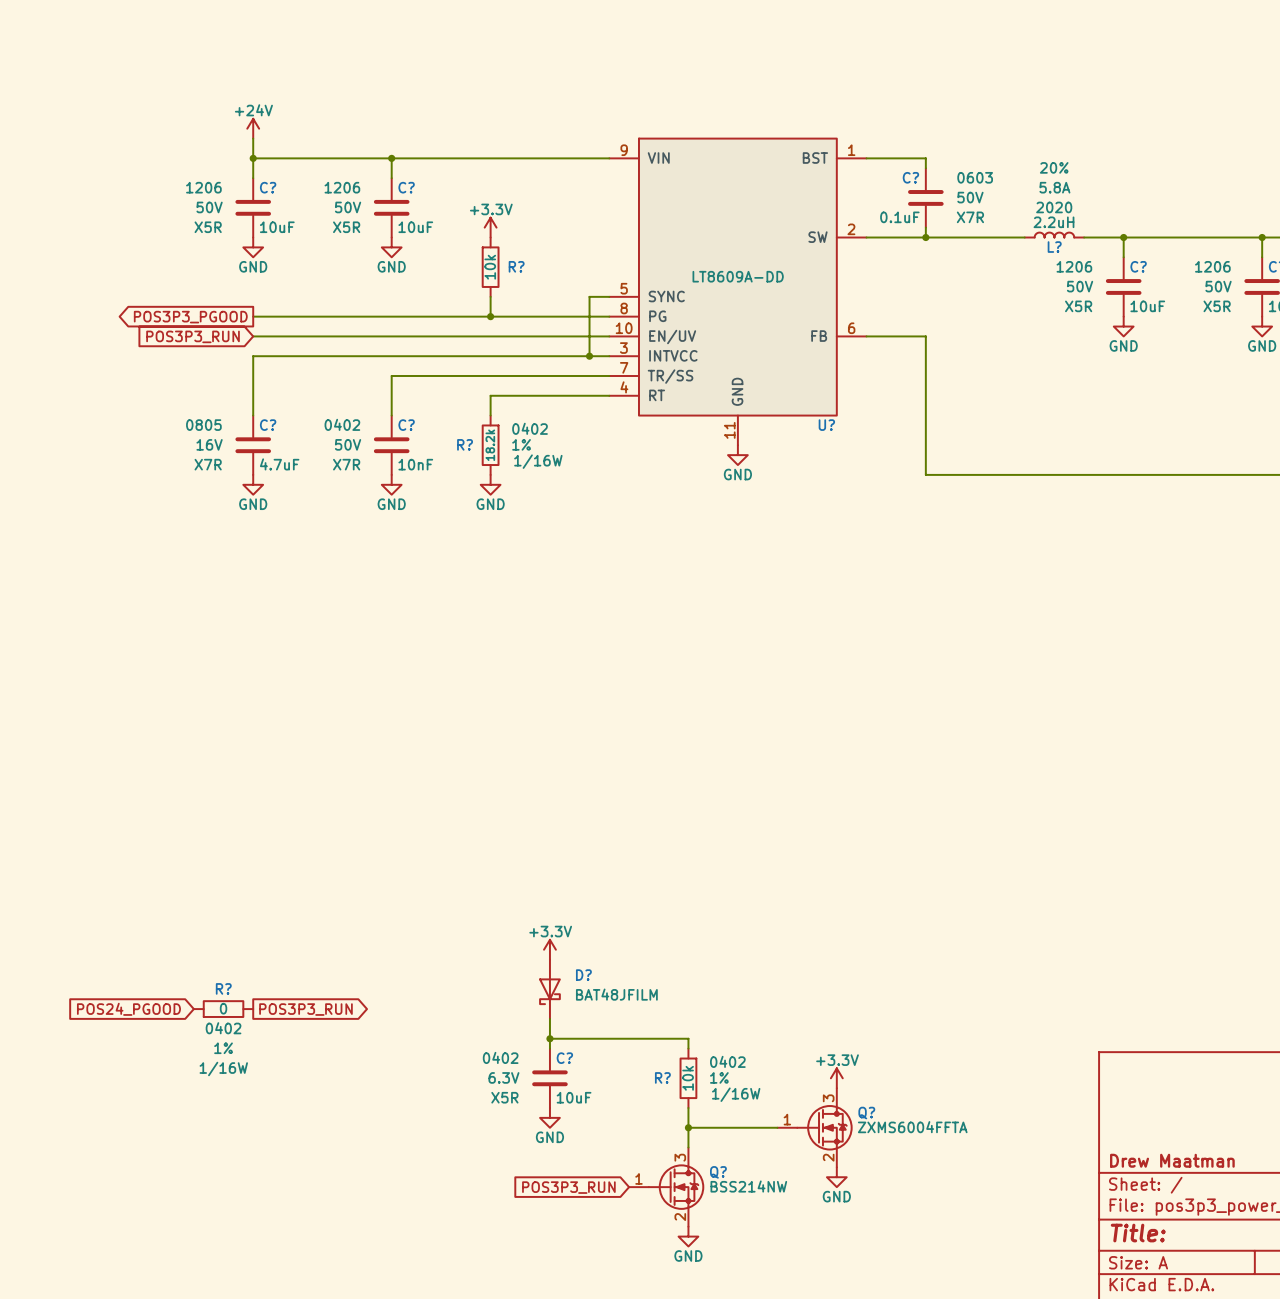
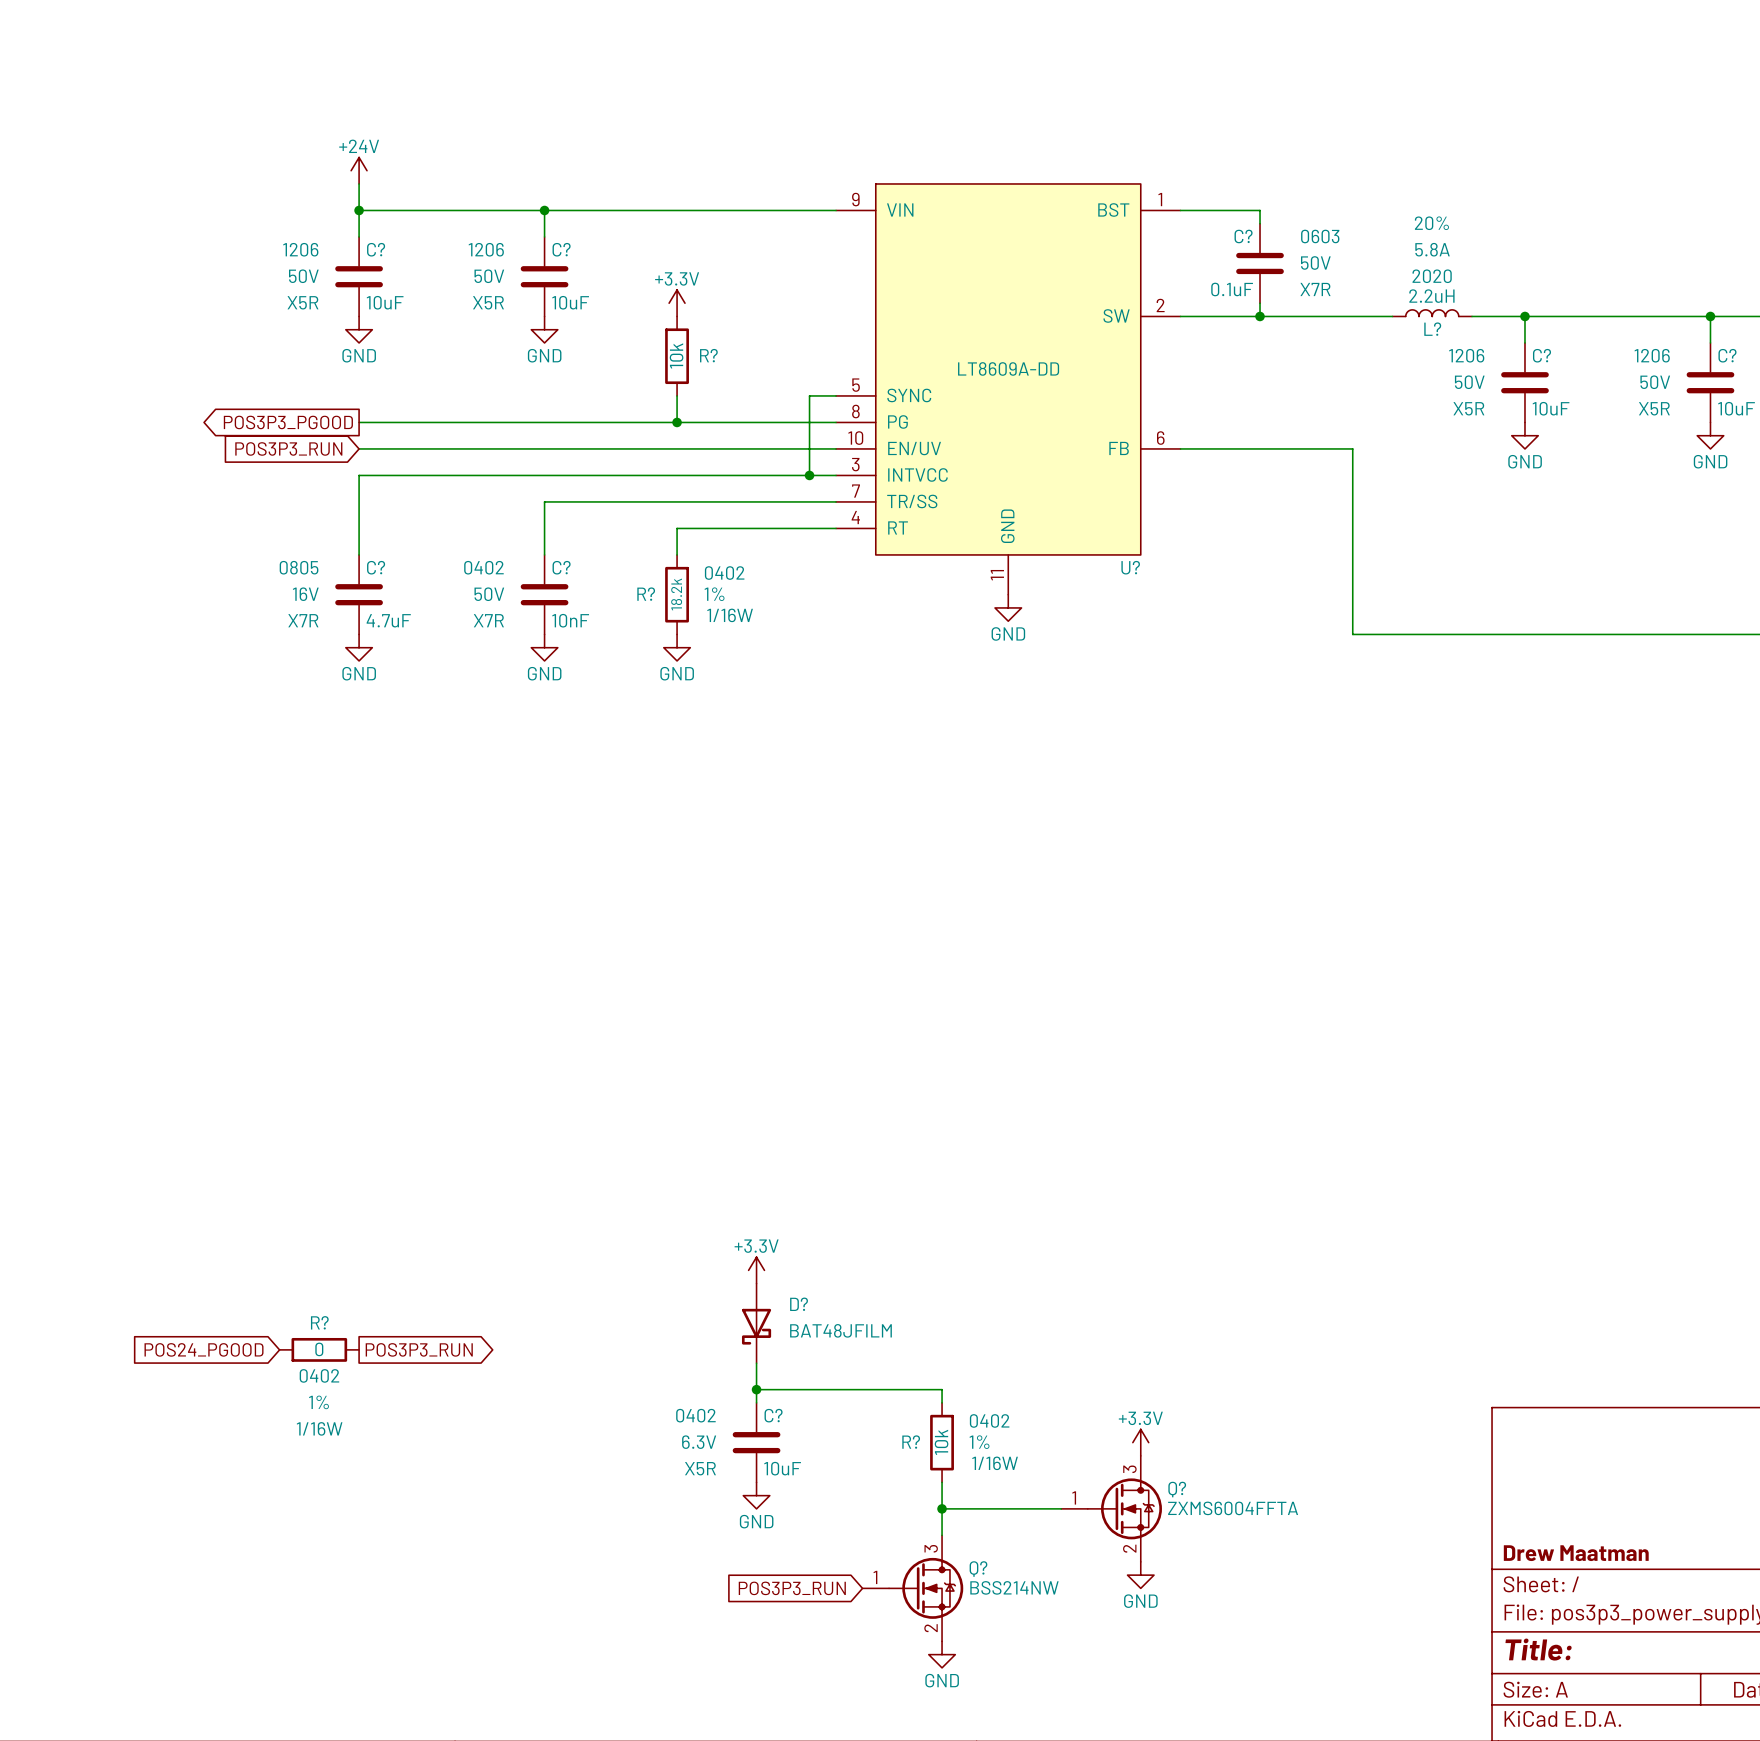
wire: (925, 336) (925, 474) (995, 474) -> (1260, 448) (1352, 448) (1352, 634)

